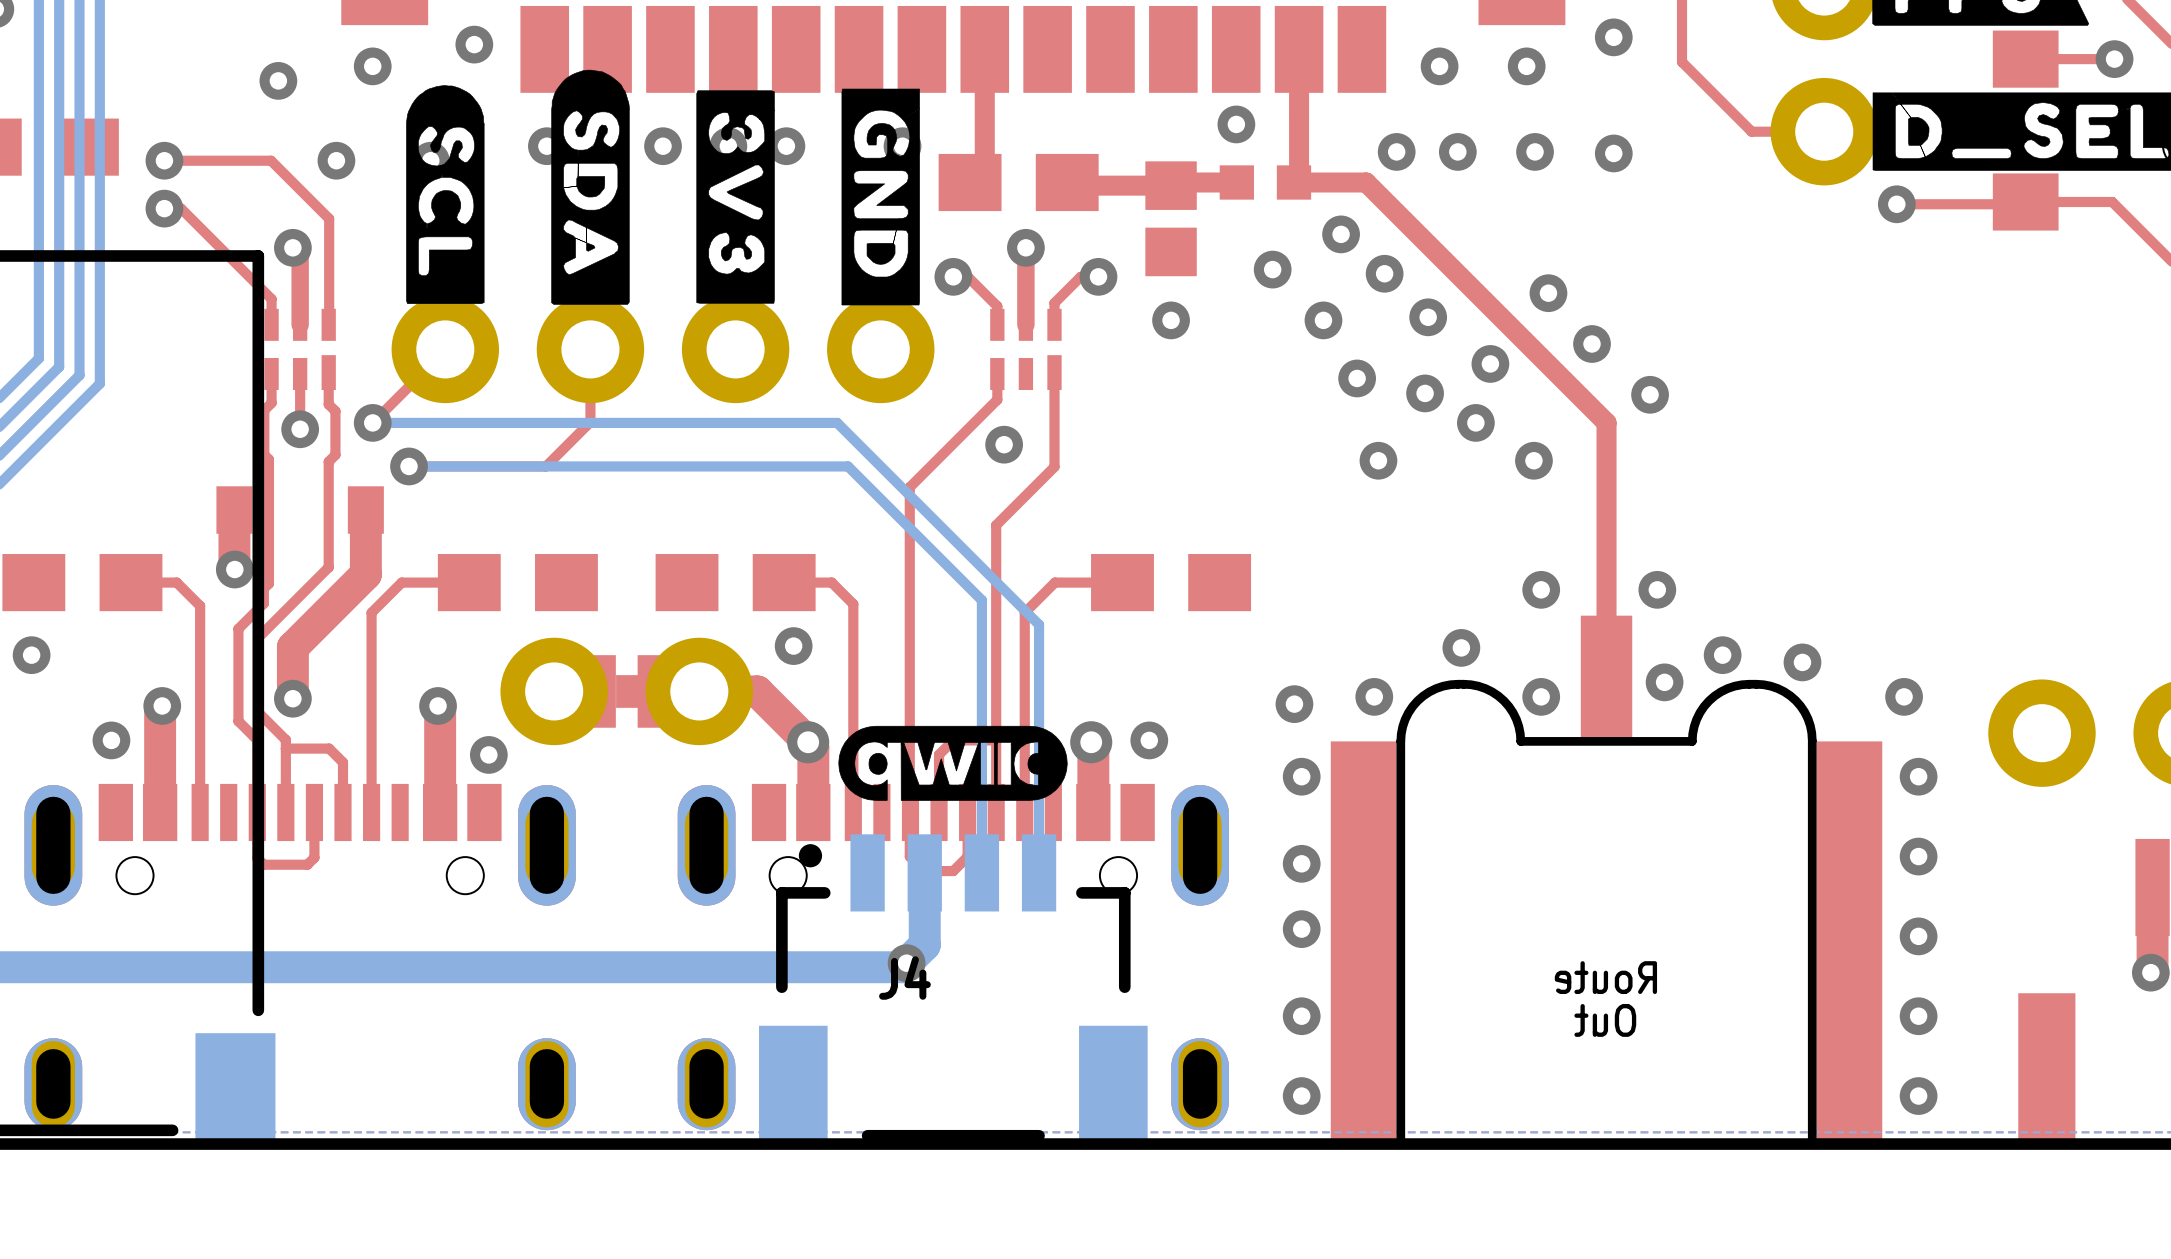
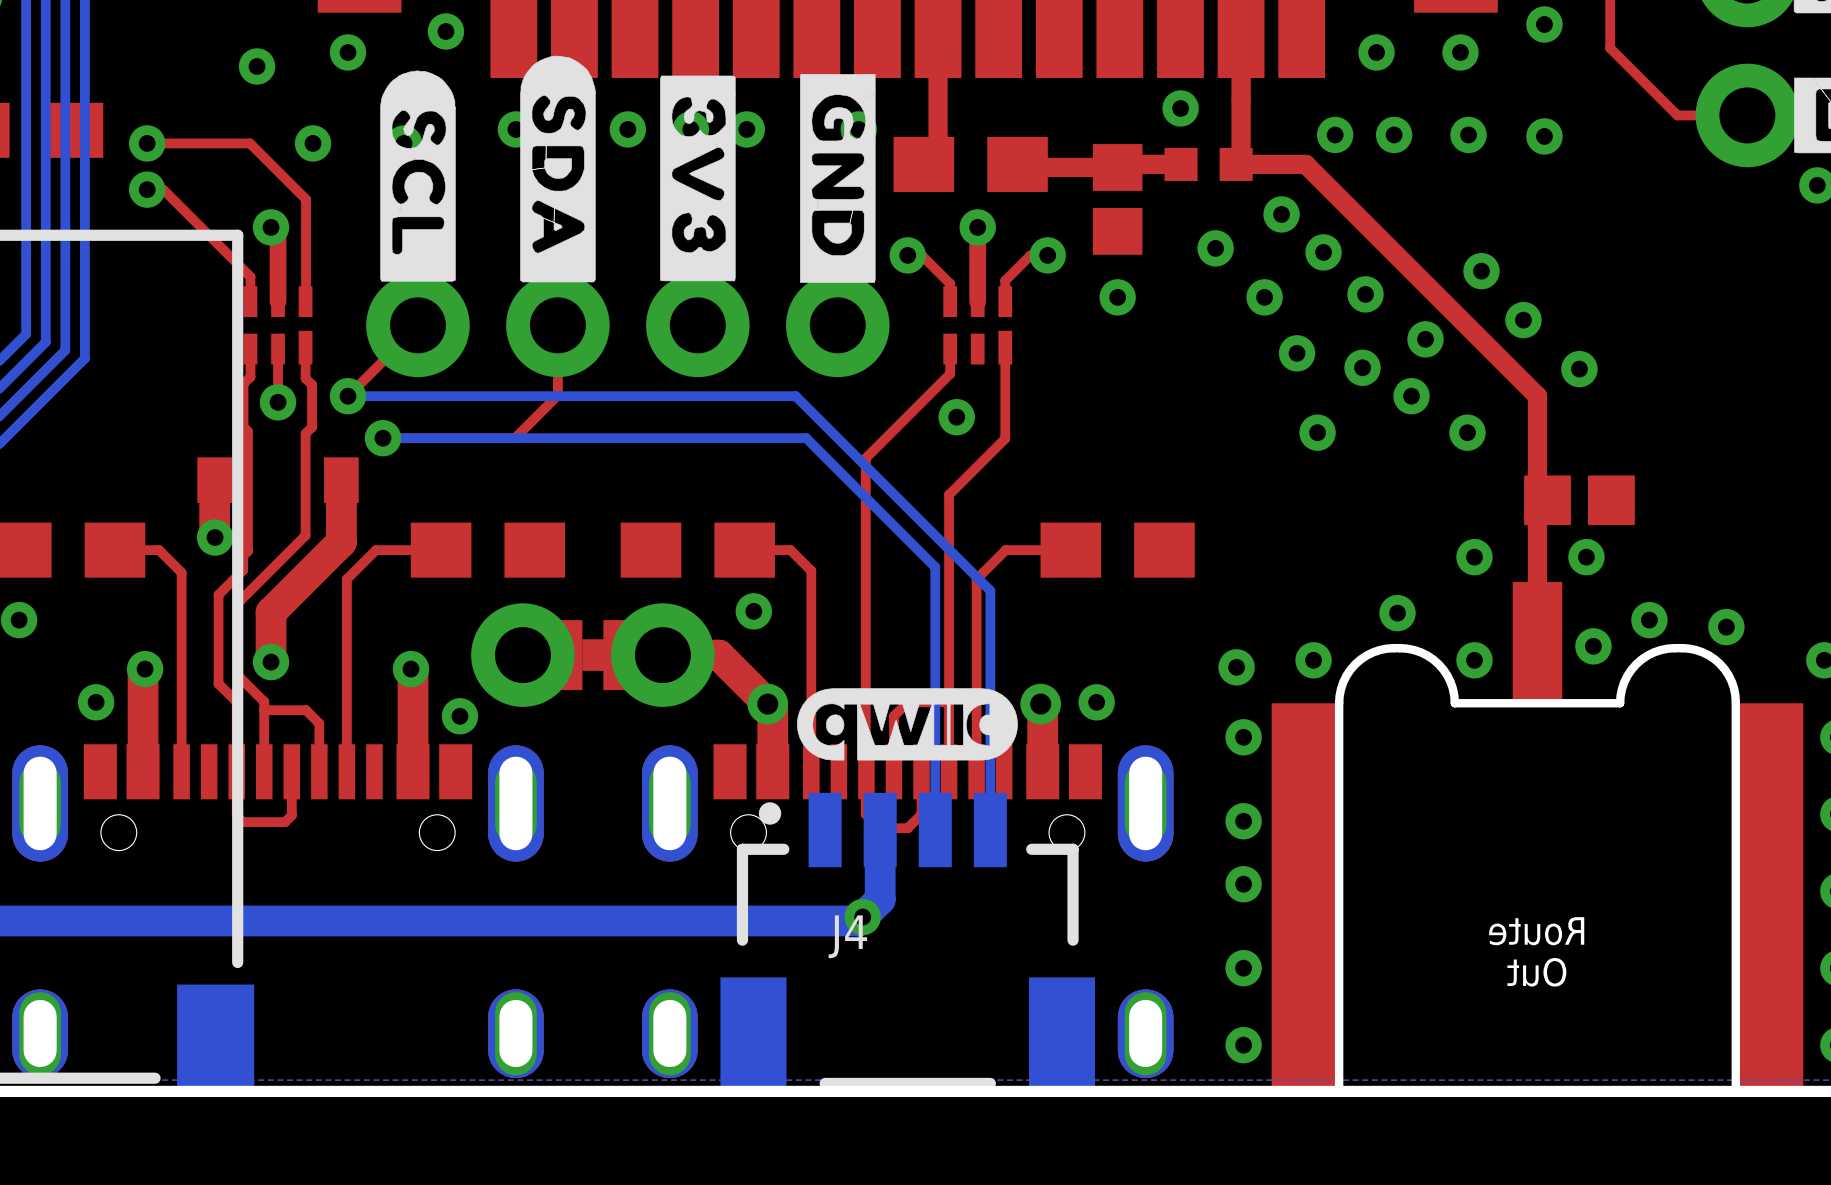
part: none -> (1579, 500)

